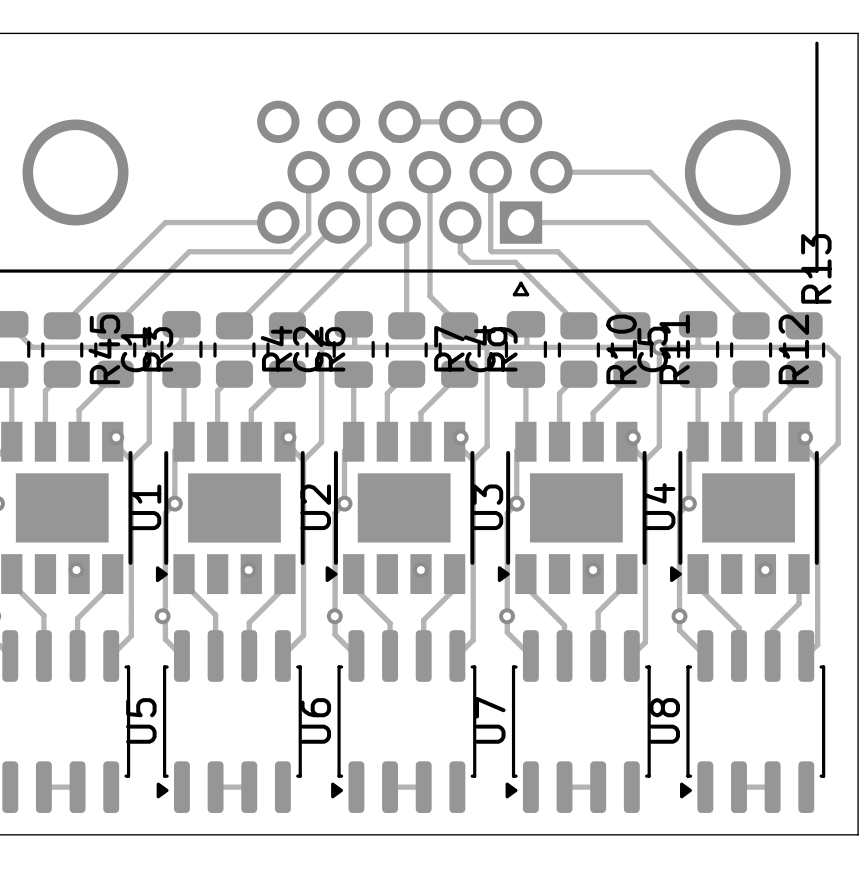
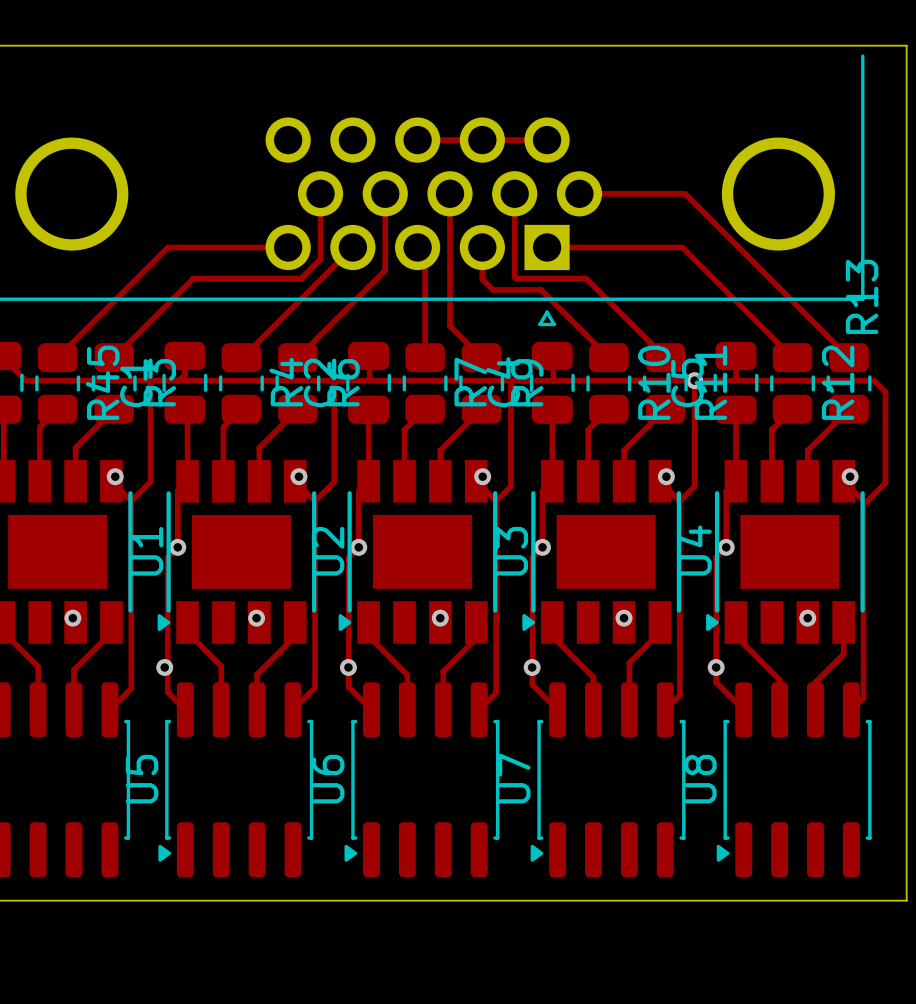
track: (43, 787) (77, 787) -> none
track: (215, 787) (249, 787) -> none
track: (390, 787) (423, 787) -> none
track: (564, 787) (598, 787) -> none
track: (738, 787) (772, 787) -> none

